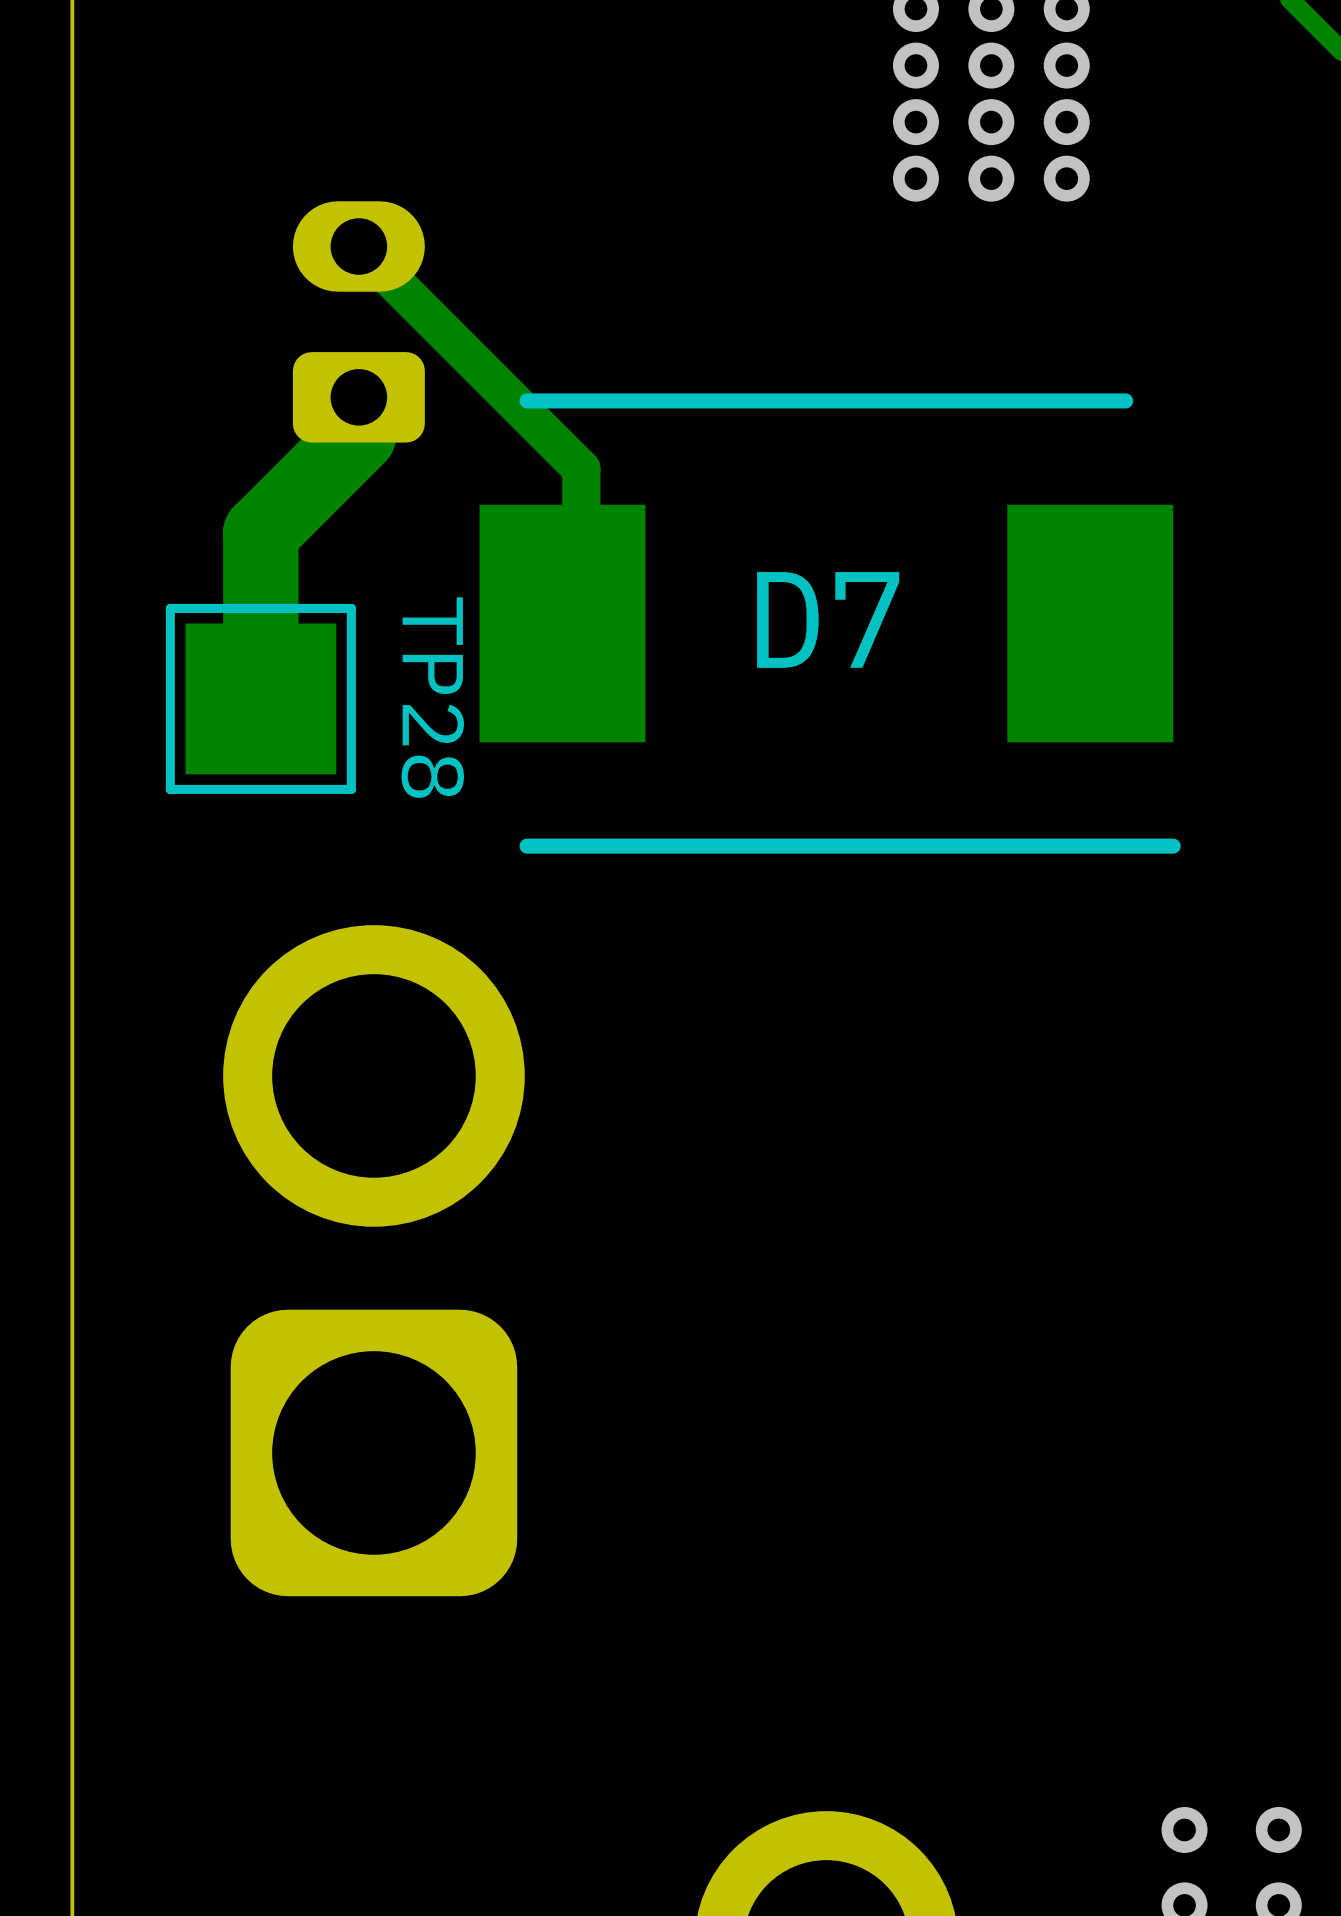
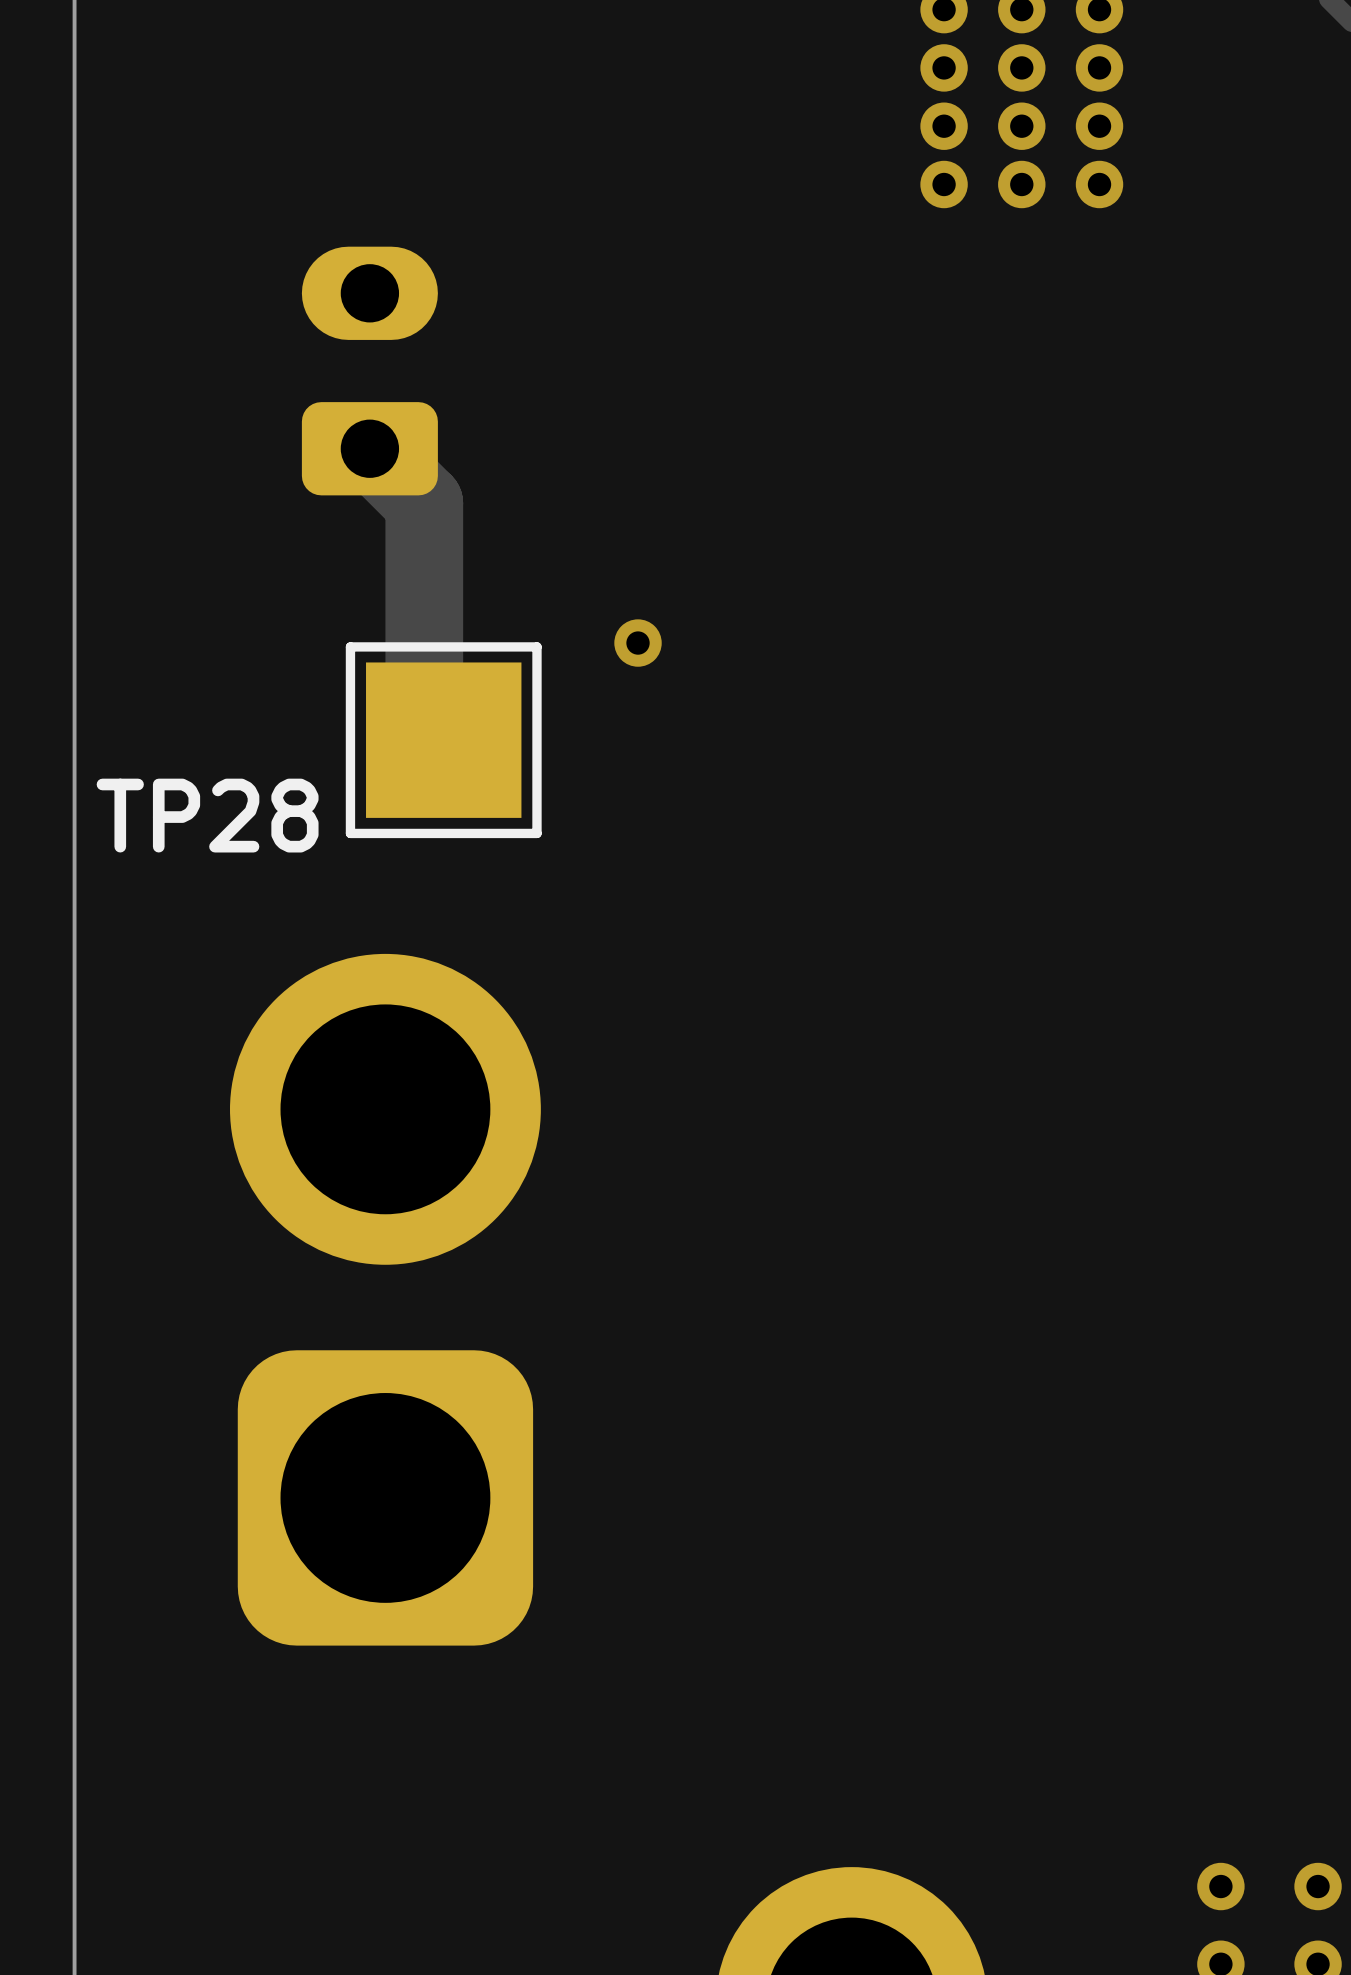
track: (358, 246) (581, 468) (581, 623) -> none
part position: (358, 321) -> (369, 371)
track: (358, 435) (260, 533) (260, 717) -> (369, 448) (424, 503) (424, 701)
via: none -> (638, 643)
D7: (830, 623) -> none
TP28 name rotation: 0° (432, 697) -> 90° counterclockwise (207, 815)
TP28 position: (260, 698) -> (443, 740)

